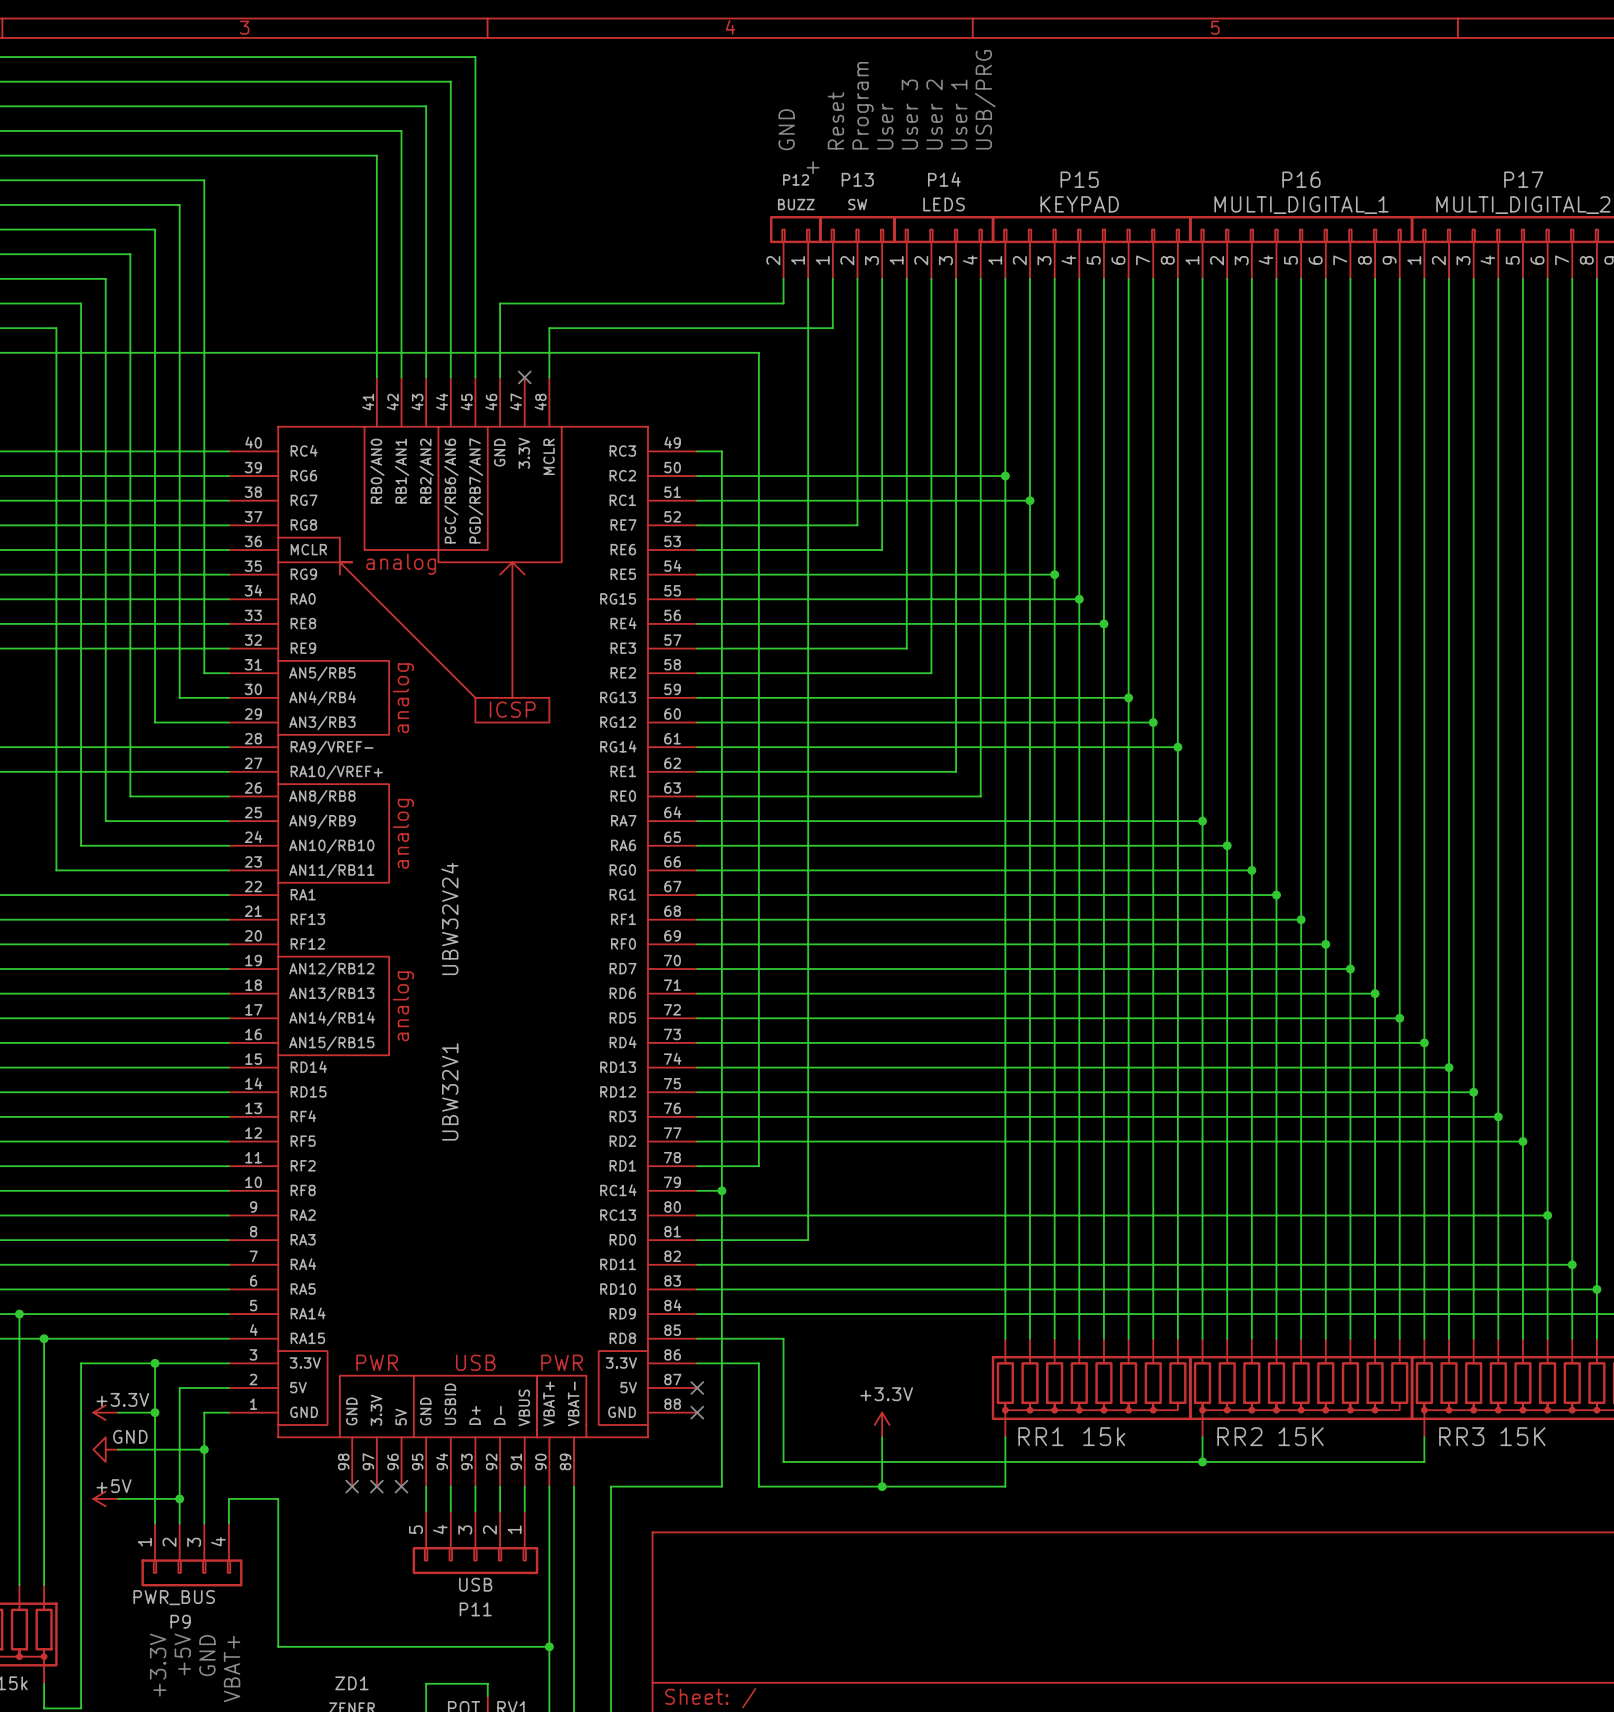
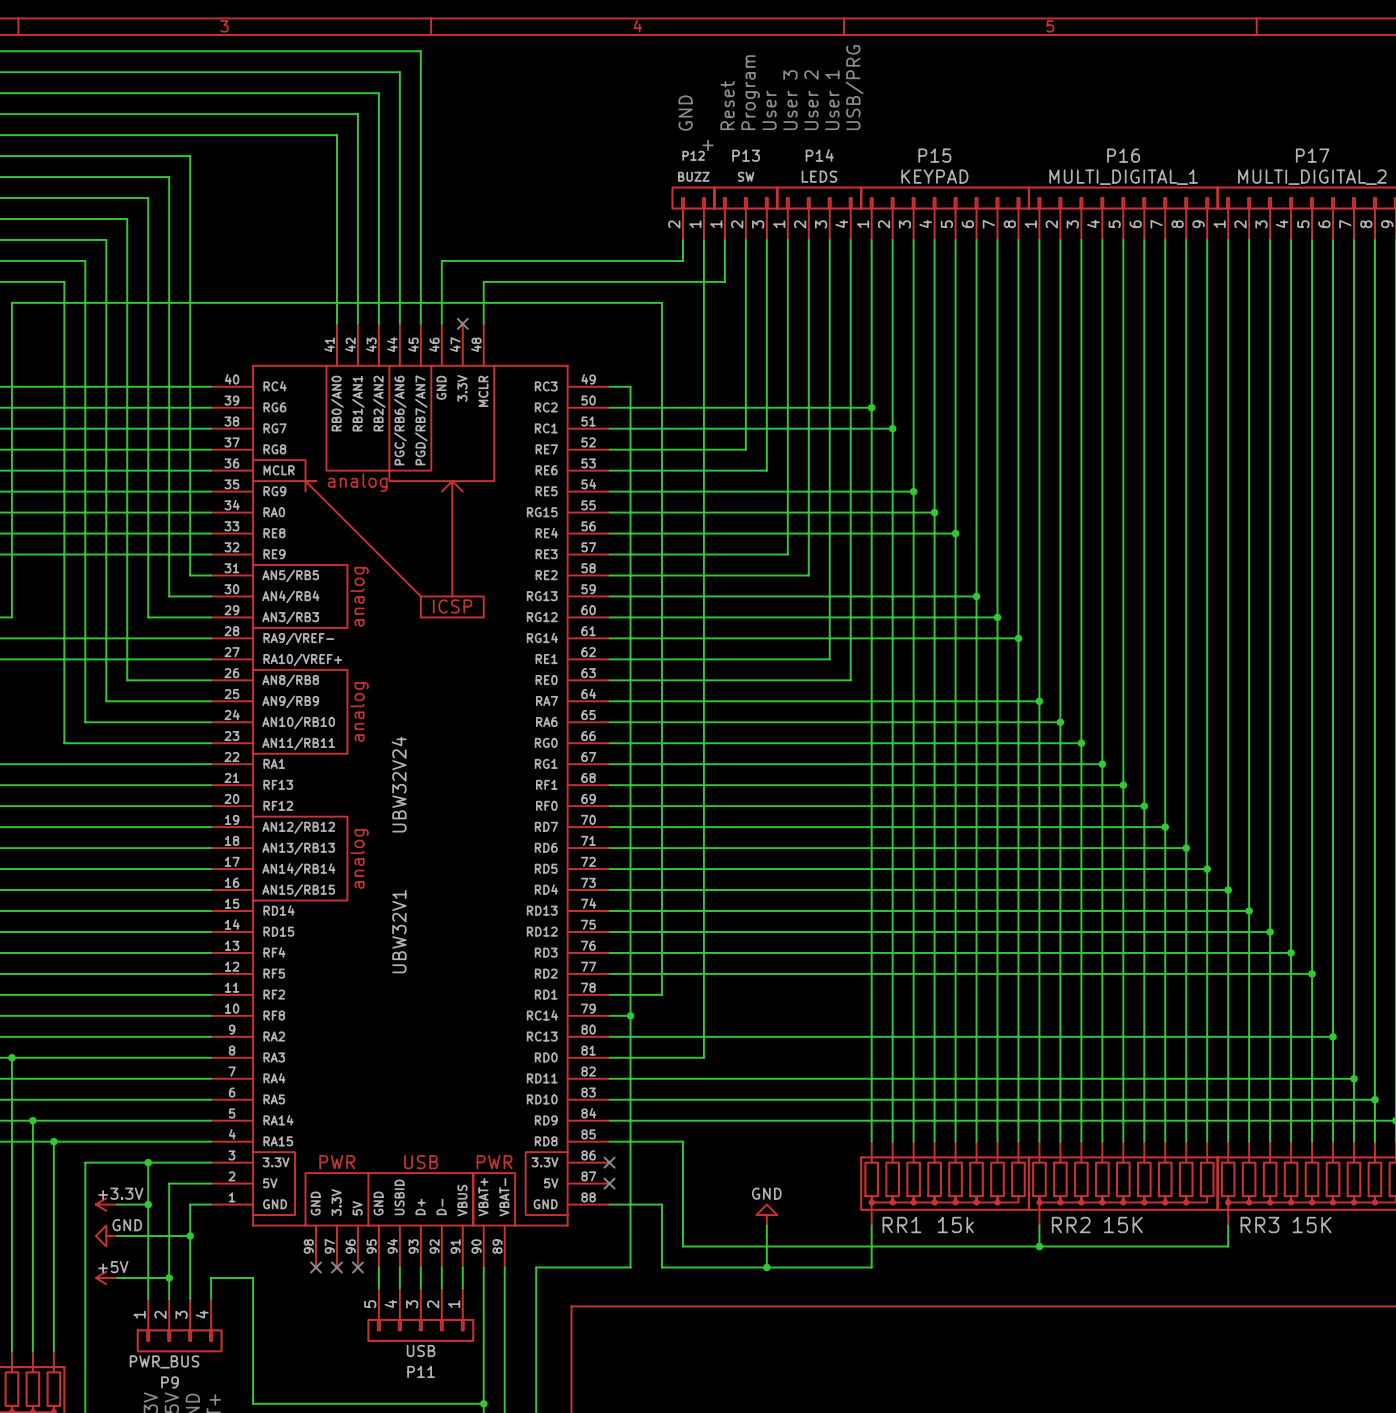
wire: (697, 1363) (758, 1363) (758, 1412) -> (609, 1204) (661, 1204)
no-connect mark position: (697, 1412) -> (609, 1162)
power symbol: +3.3V (882, 1424) -> GND (766, 1215)

